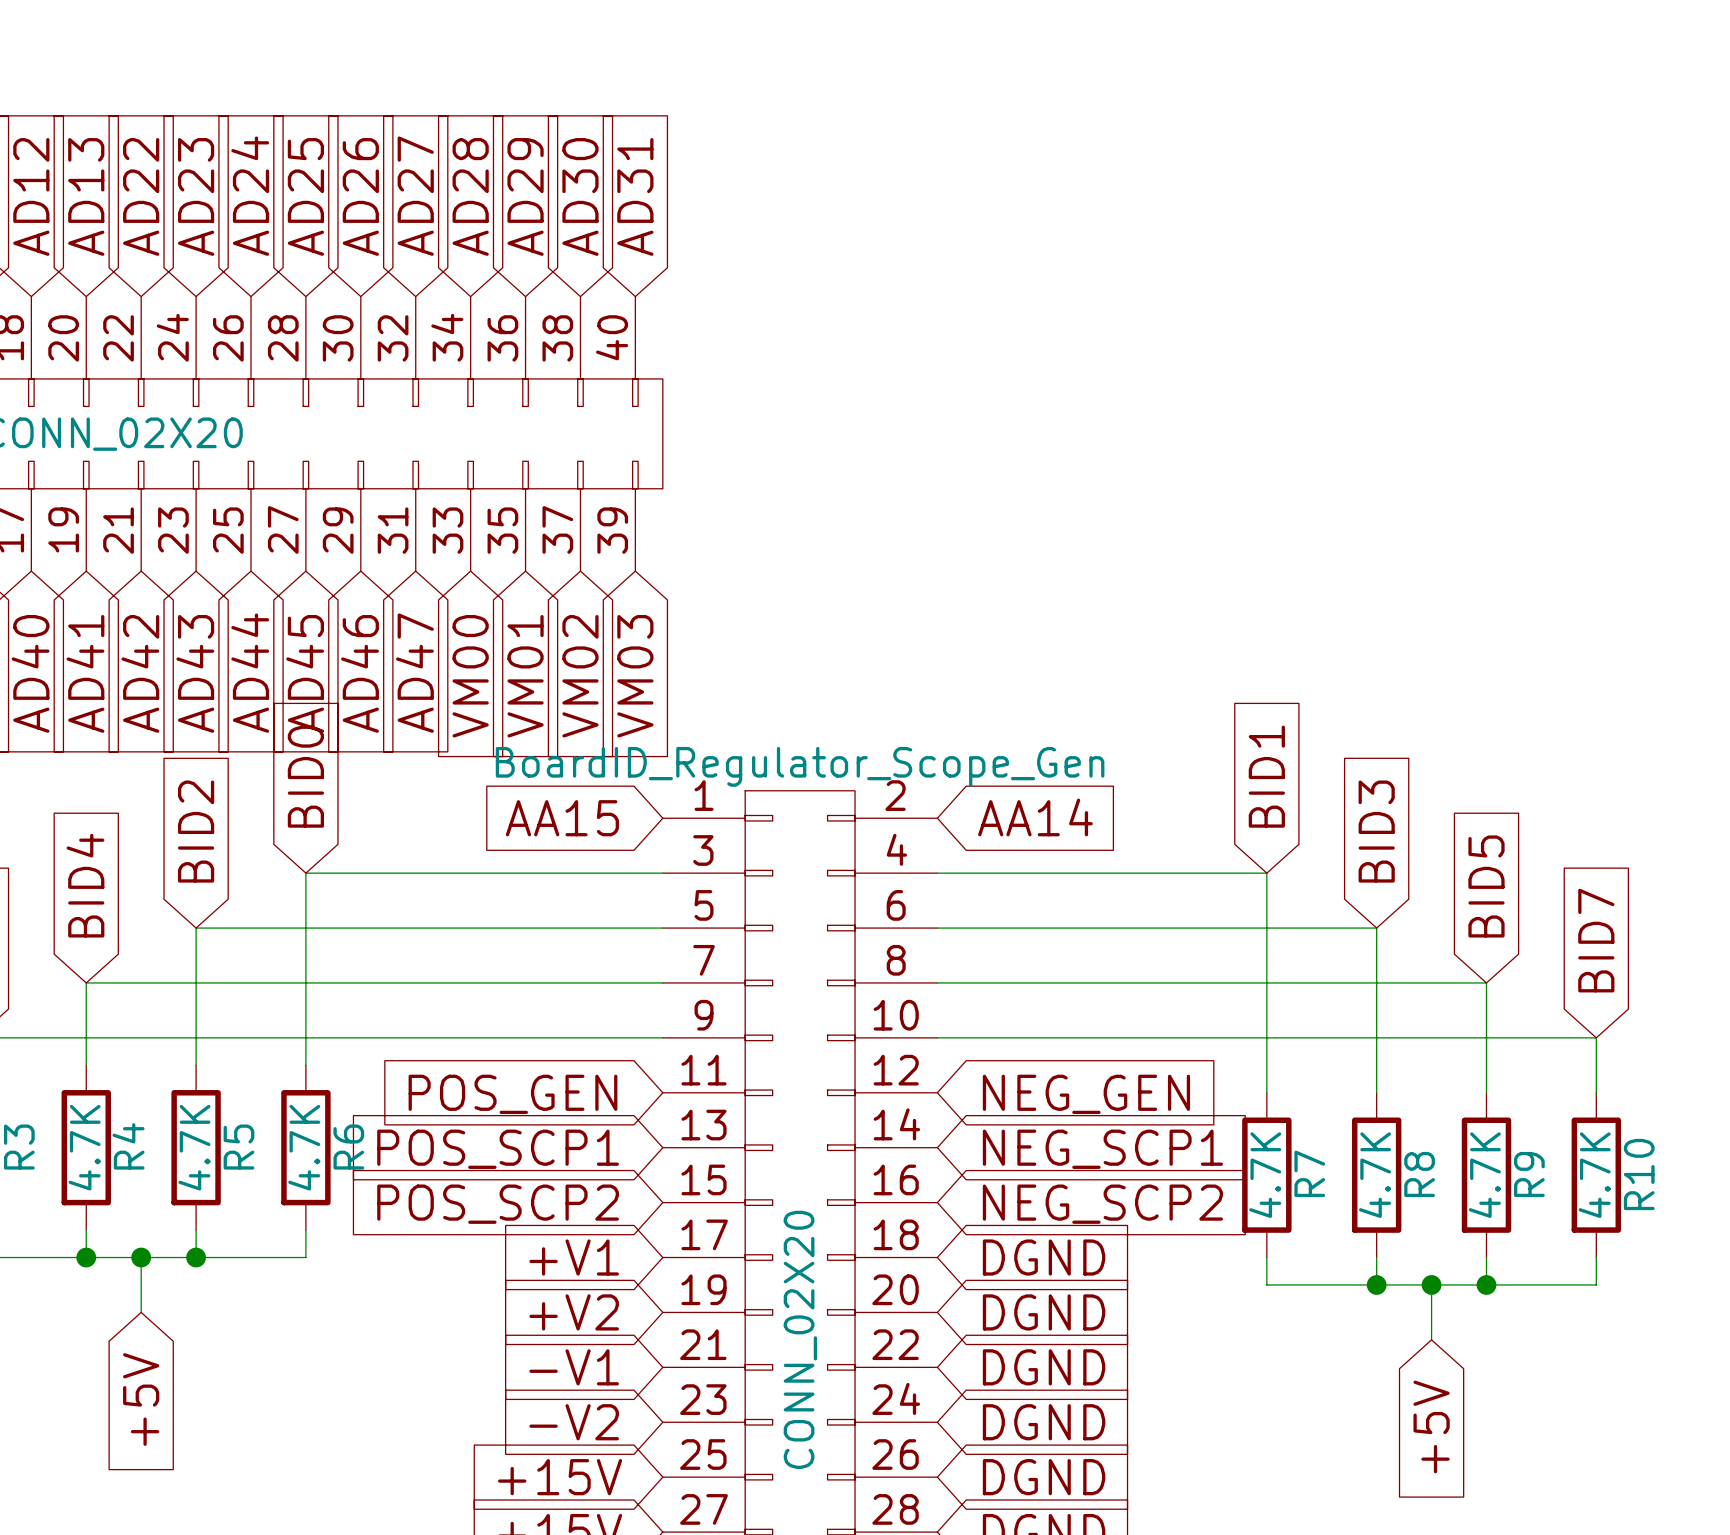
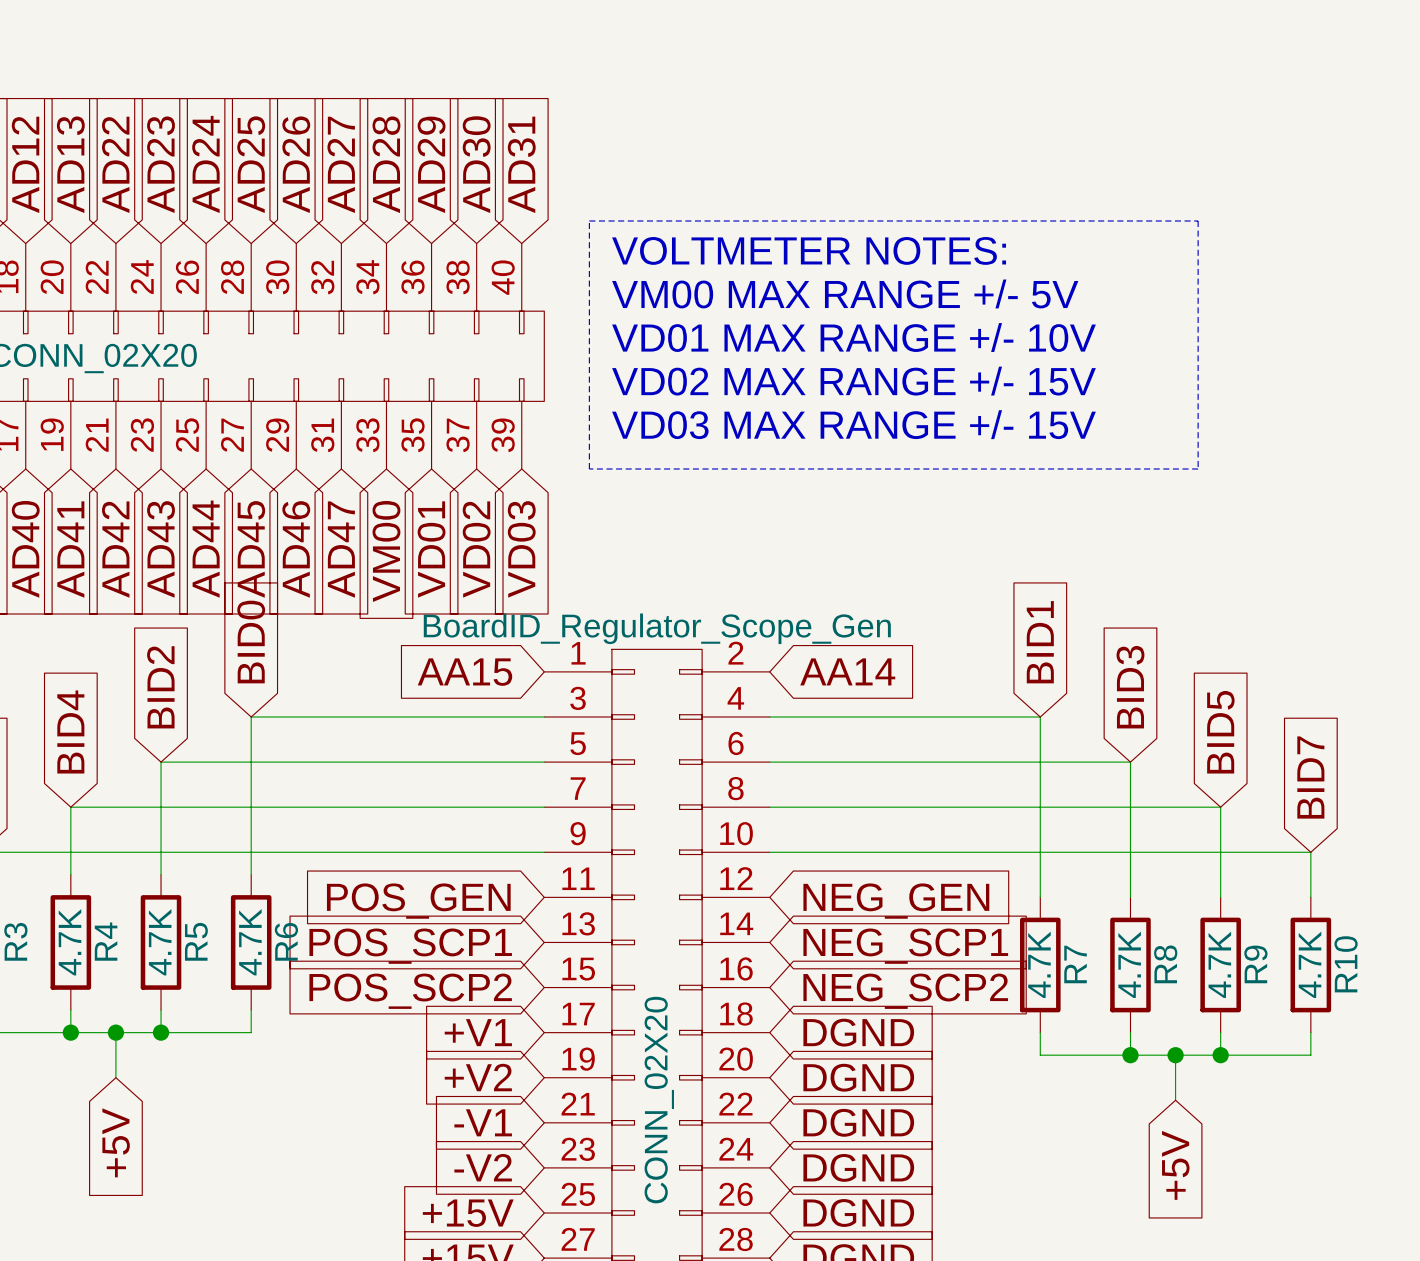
line: none -> (589, 221) (1198, 221) (1198, 469) (589, 469) (589, 221)
text: none -> VOLTMETER NOTES: (809, 250)
text: none -> VM00 MAX RANGE +/- 5V (845, 293)
text: none -> VD01 MAX RANGE +/- 10V (853, 337)
text: none -> VD02 MAX RANGE +/- 15V (853, 381)
text: none -> VD03 MAX RANGE +/- 15V (853, 424)
global label: VM01 (525, 676) -> VD01 (431, 549)
global label: VM02 (580, 676) -> VD02 (476, 549)
global label: VM03 (635, 676) -> VD03 (521, 549)

